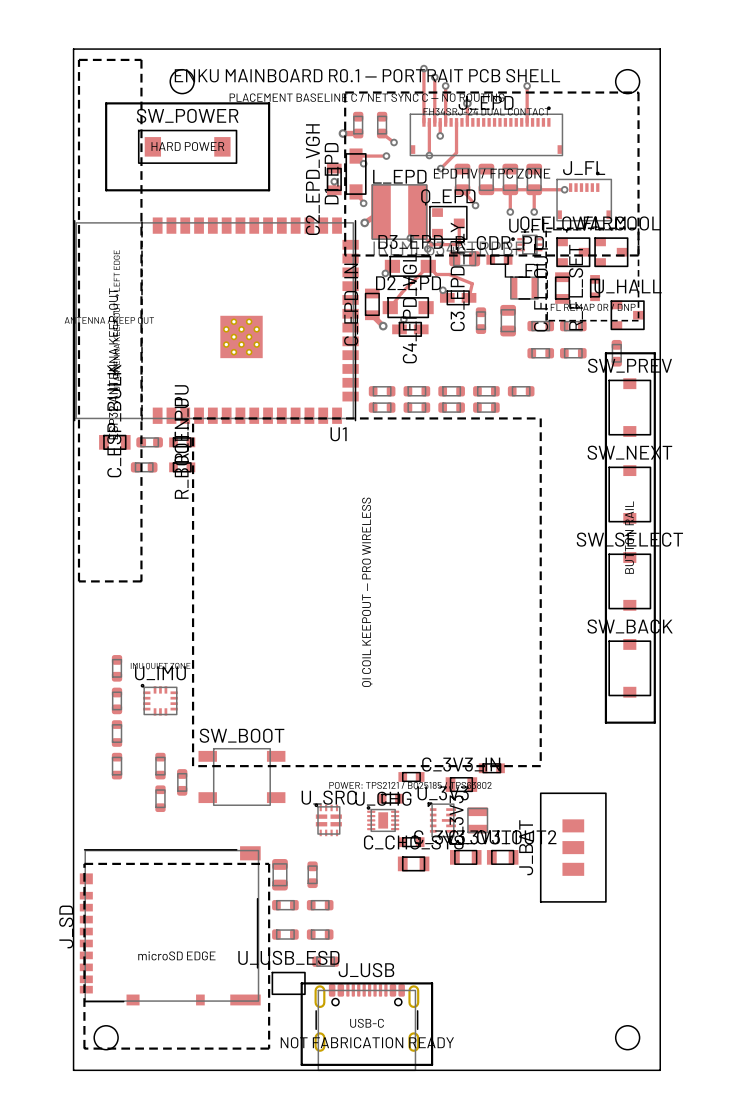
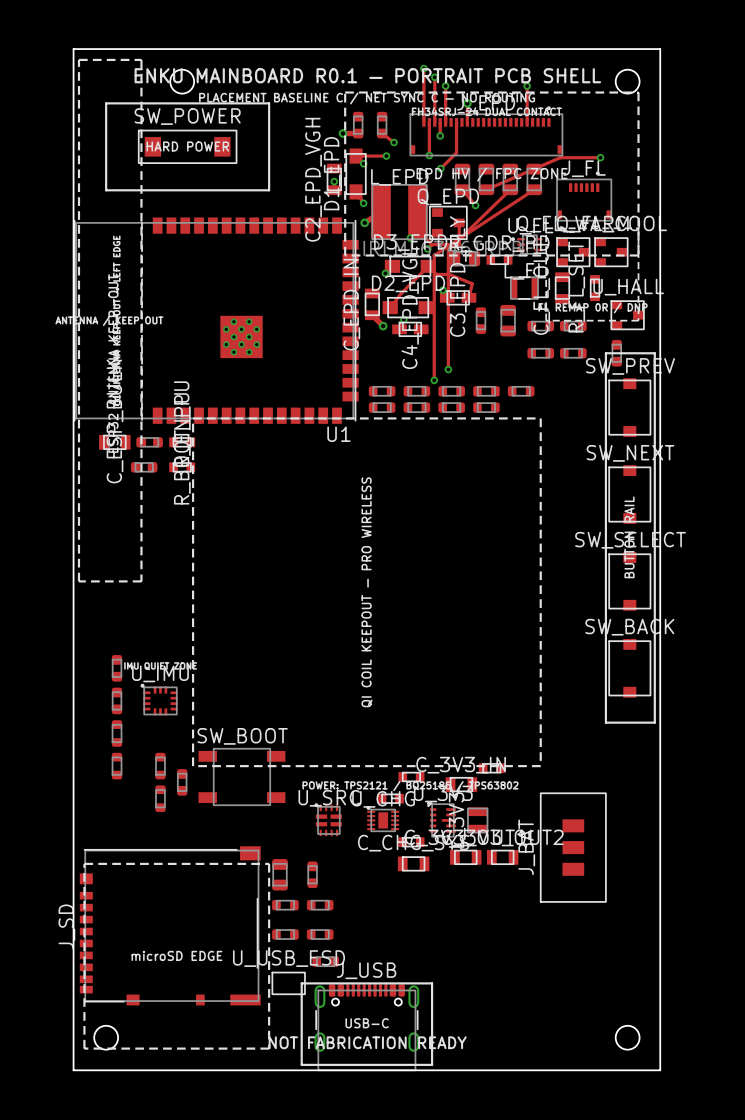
via: none -> (600, 157)
track: (486, 189) (564, 189) -> (486, 189) (560, 157) (600, 157)
track: (510, 189) (510, 212) -> (510, 189) (448, 250) (448, 369)
track: (534, 189) (534, 212) -> (534, 189) (434, 255) (434, 380)
via: (564, 189) -> none
via: (510, 212) -> none
via: (534, 212) -> none
via: none -> (448, 369)
via: none -> (434, 380)

